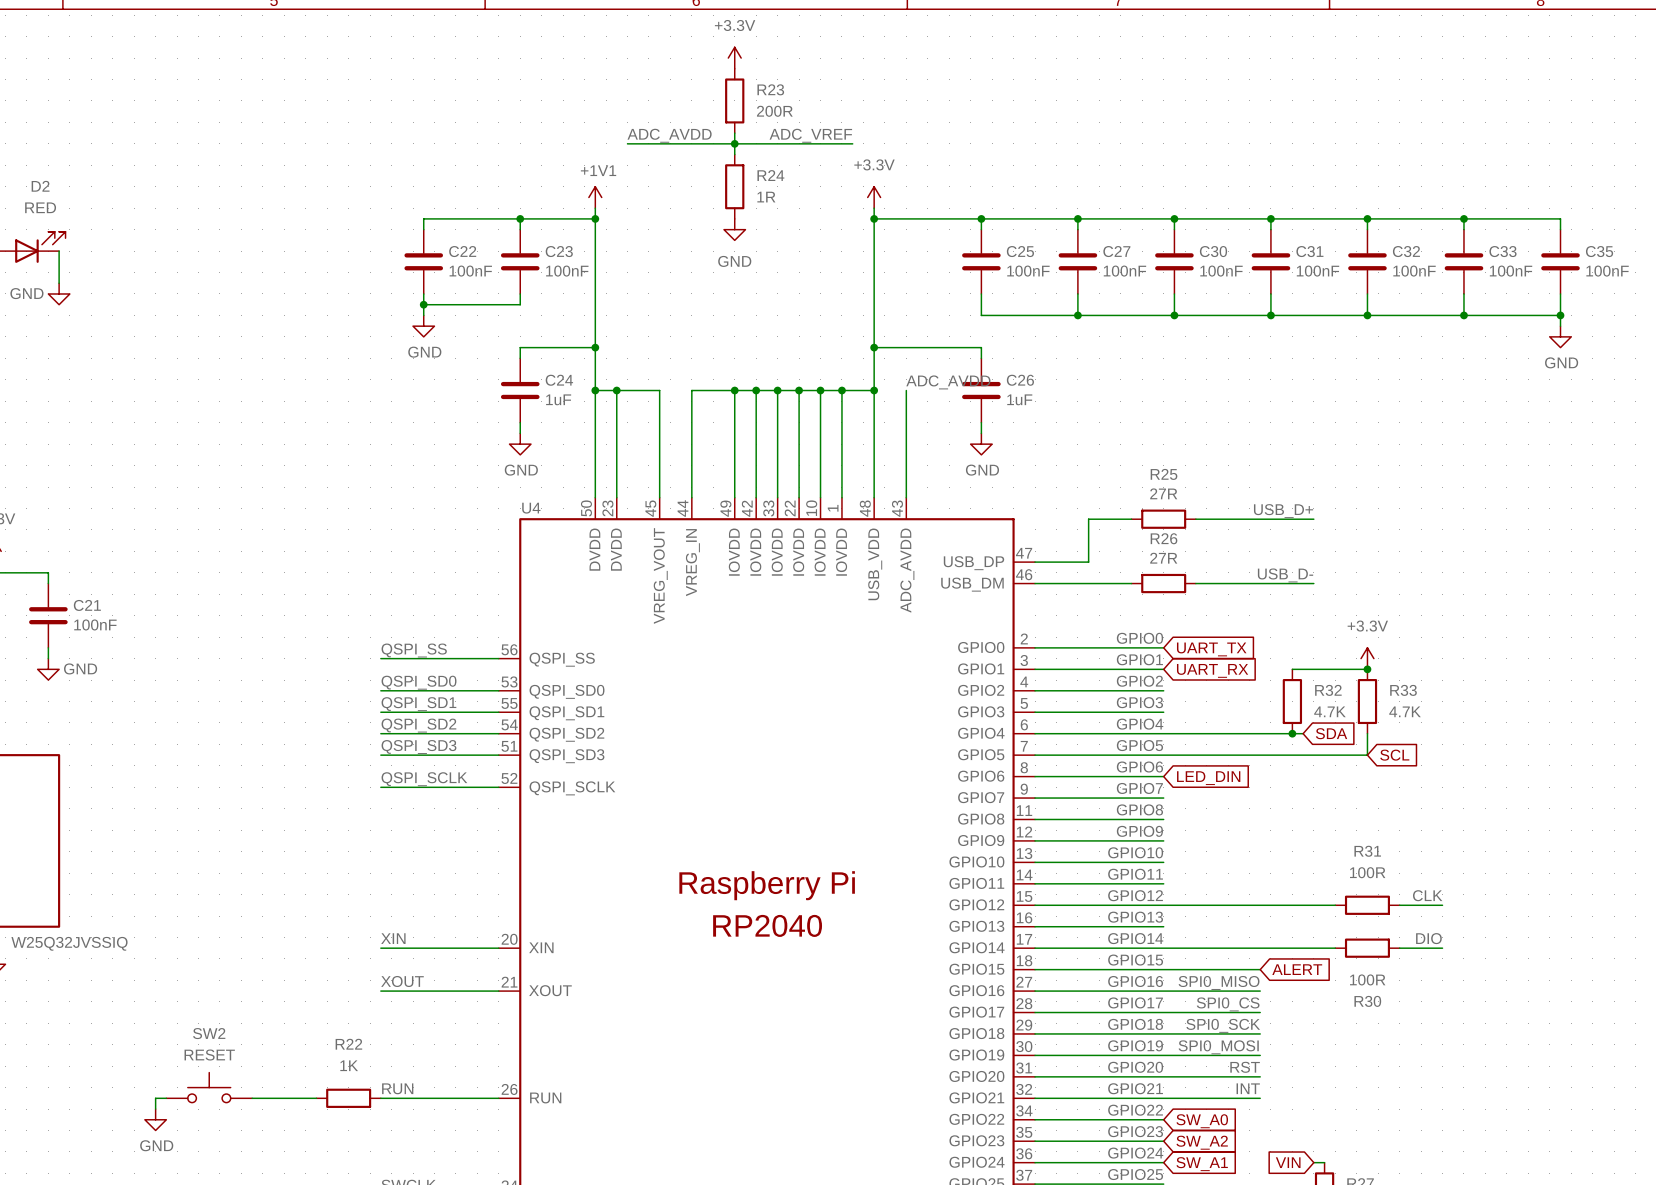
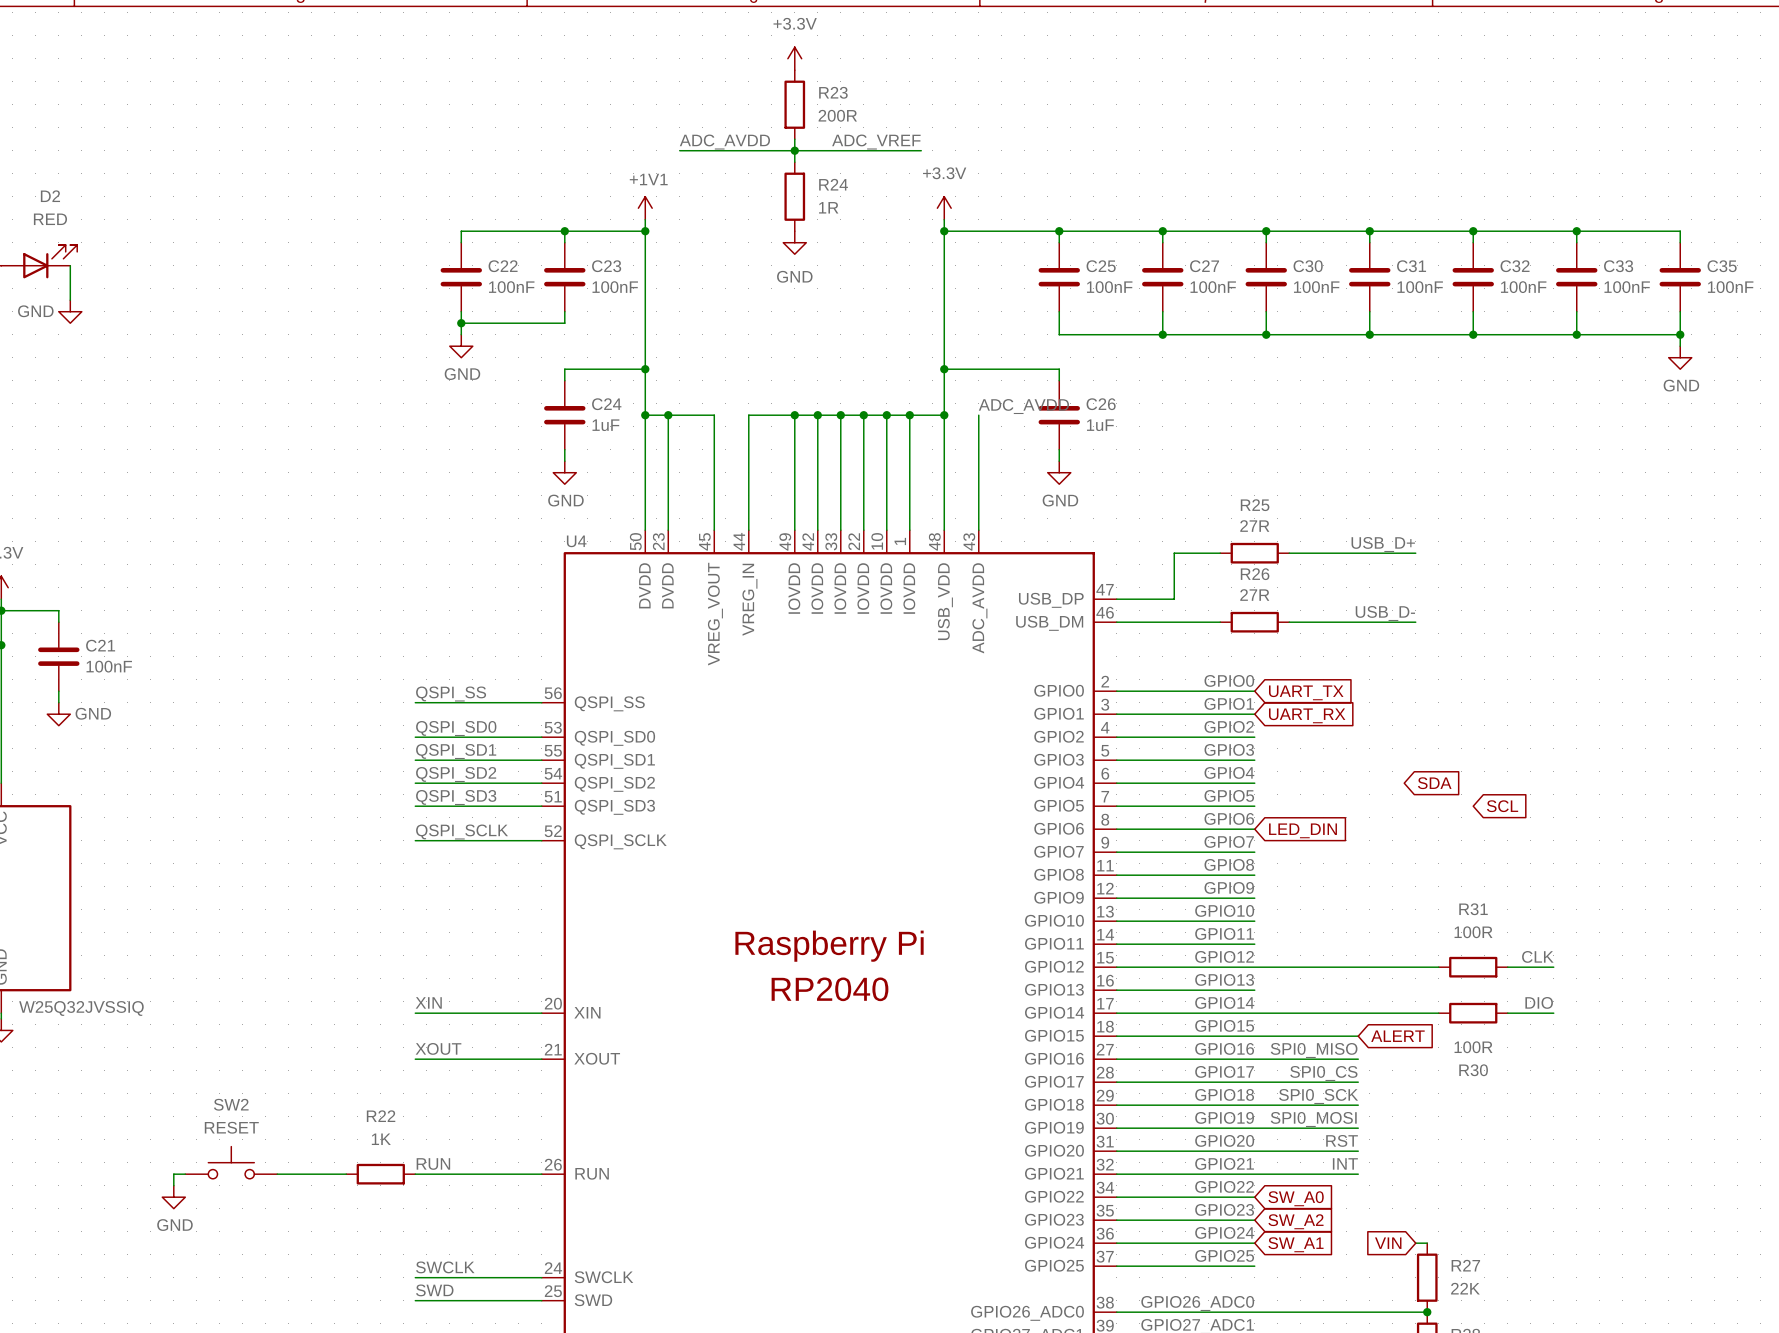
power symbol: +3.3V (1367, 658) -> none
wire: (1292, 669) (1367, 669) -> none
junction: (1367, 669) -> none
R32: 4.7K (1292, 701) -> none
R33: 4.7K (1367, 701) -> none
wire: (1163, 733) (1303, 733) -> none
junction: (1292, 733) -> none
wire: (1367, 733) (1367, 755) (1163, 755) -> none

